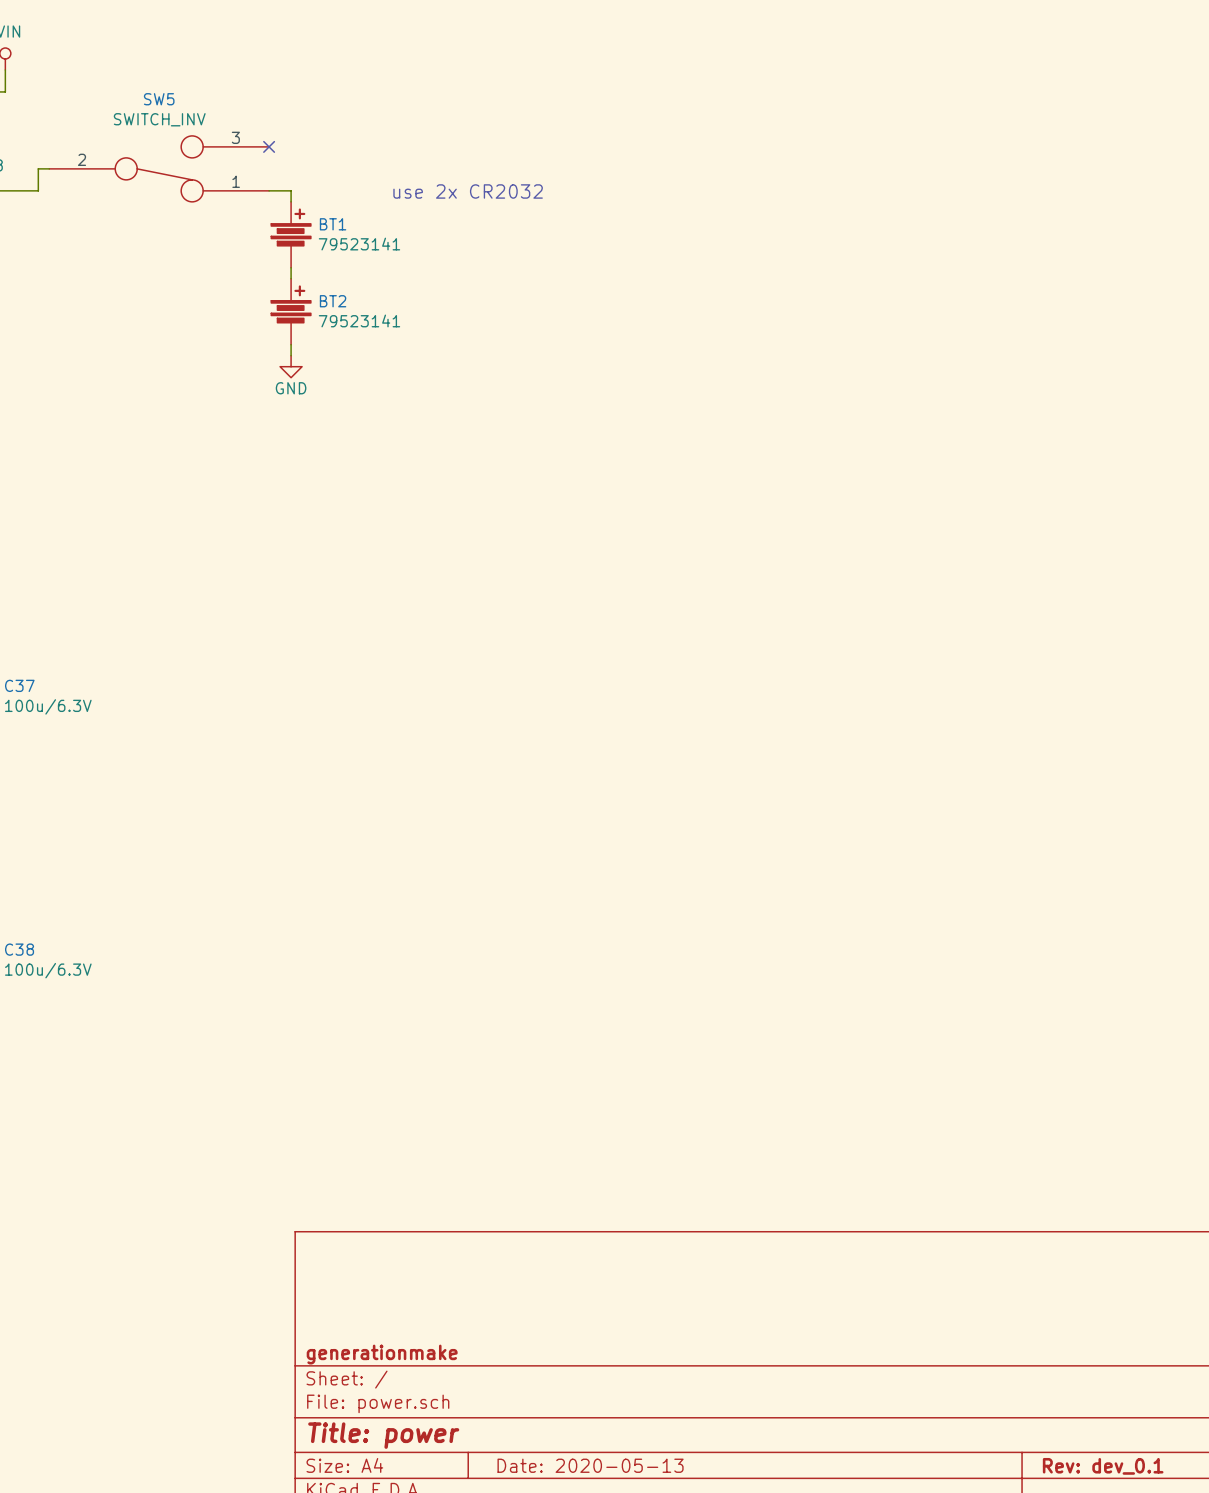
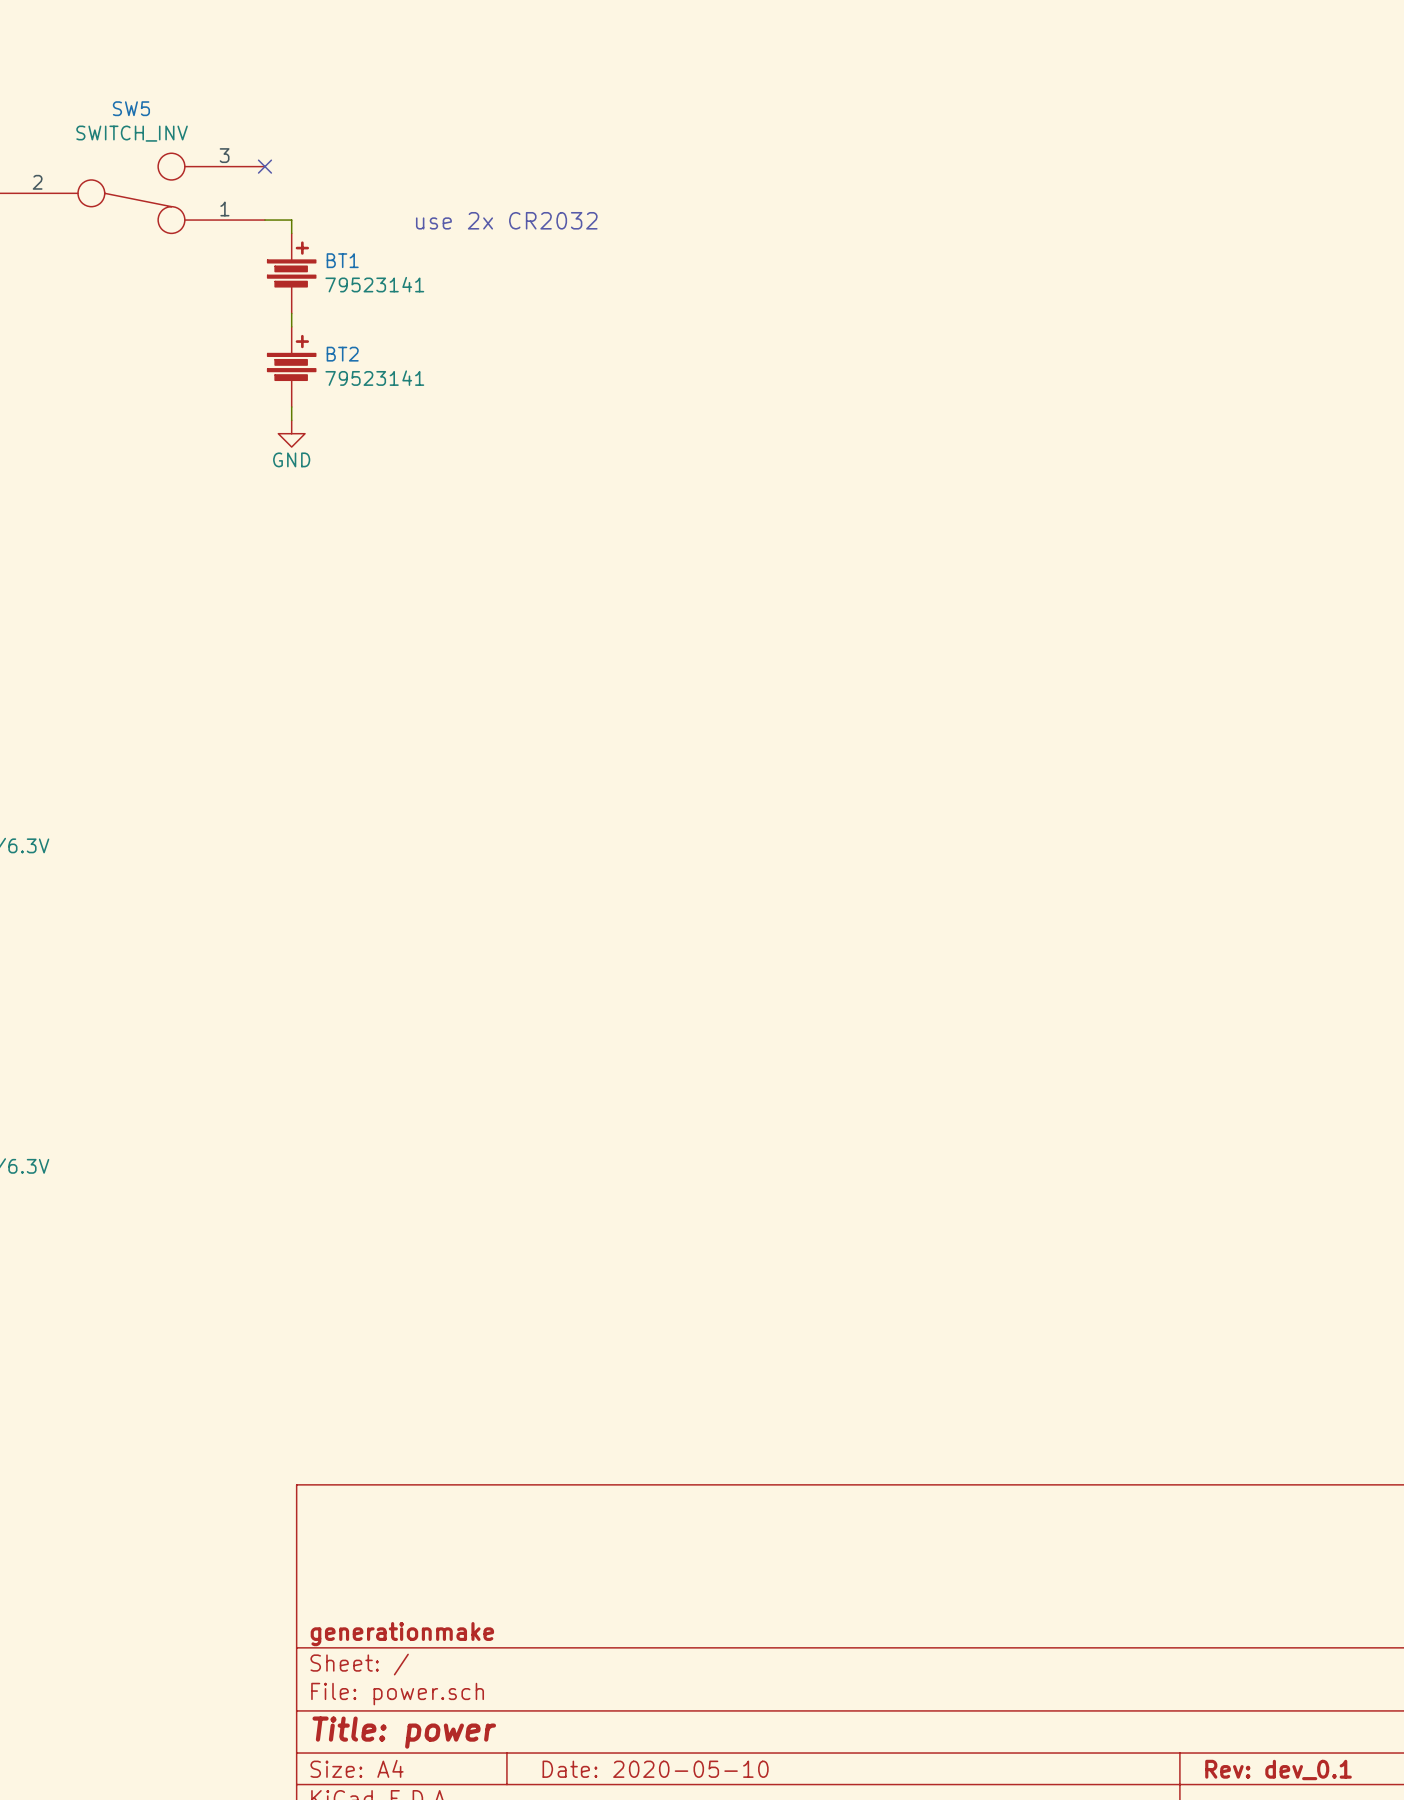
title block: Date: 2020-05-13 (590, 1465) -> Date: 2020-05-10 (655, 1769)

